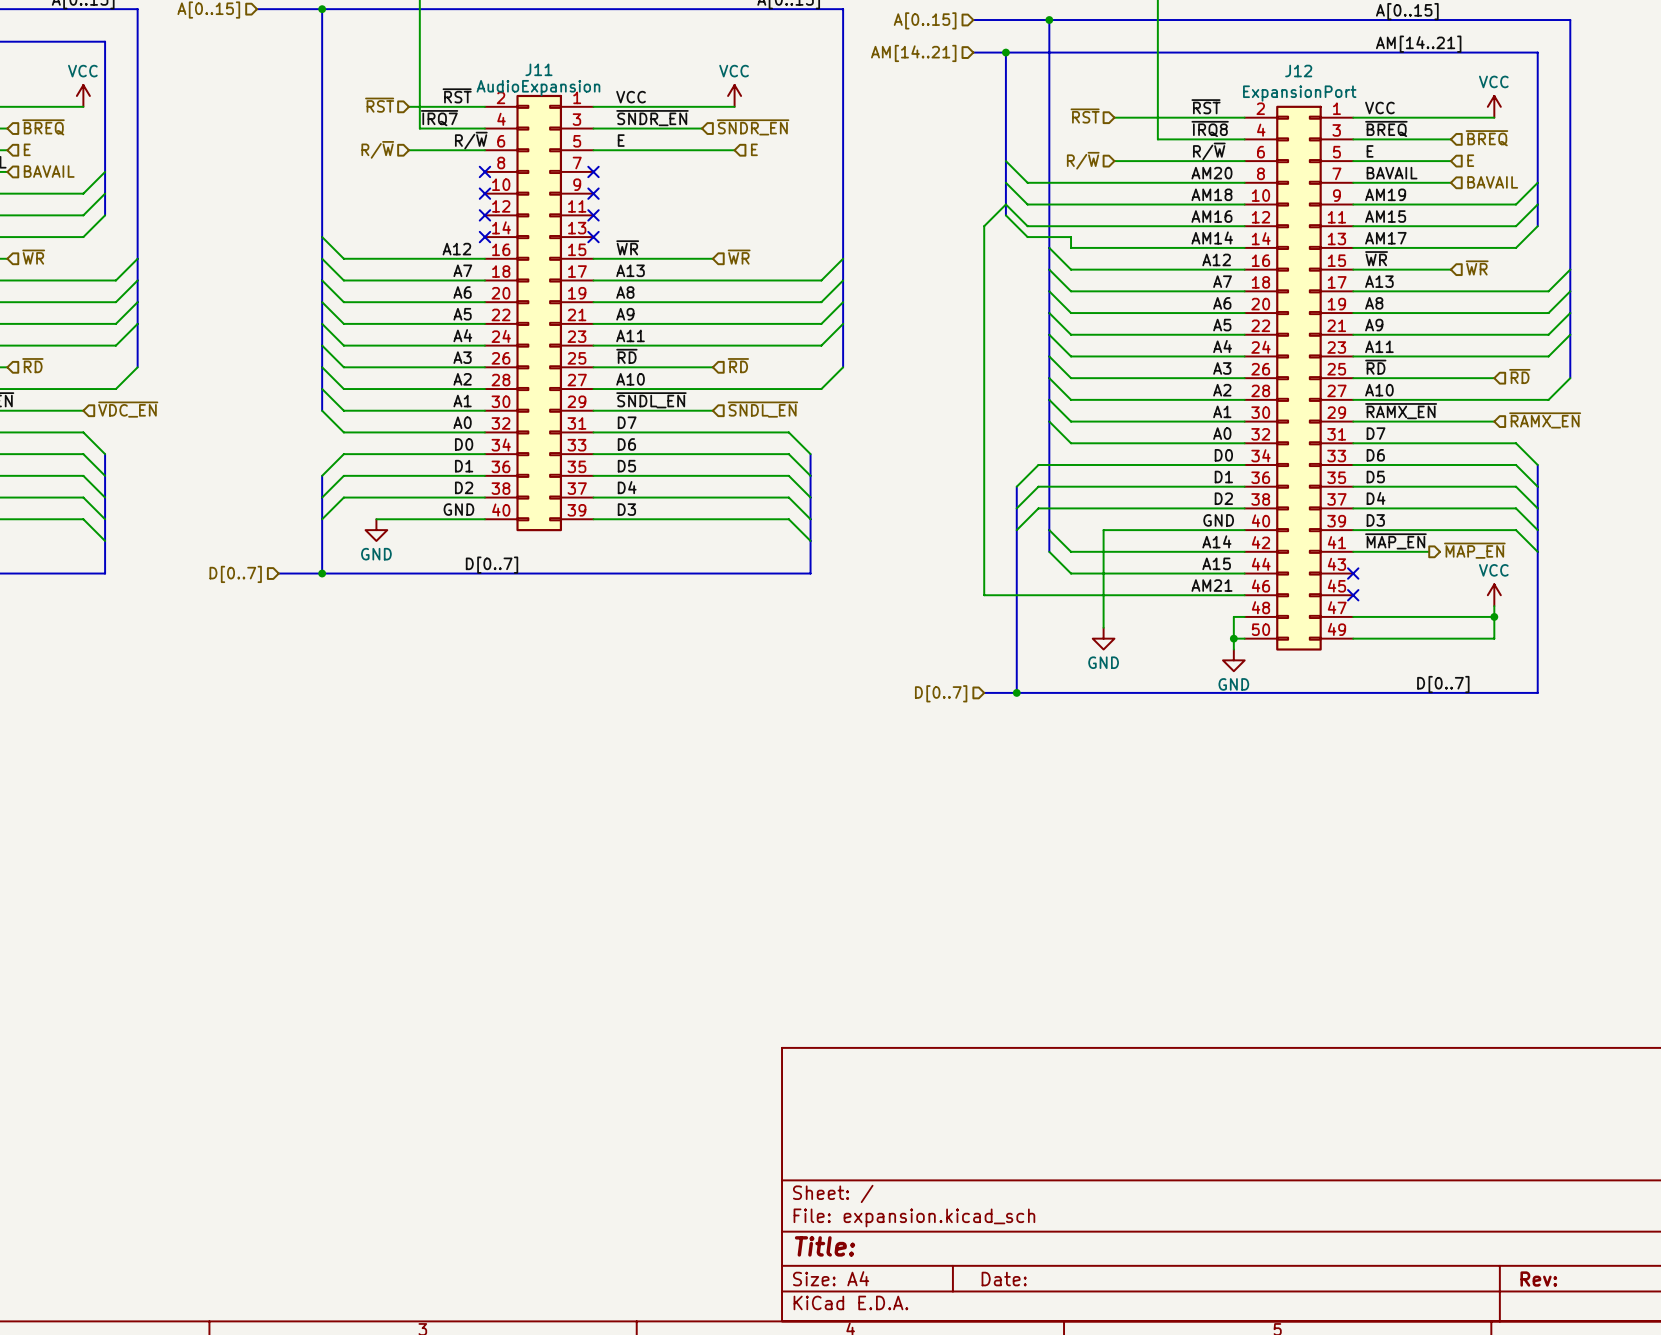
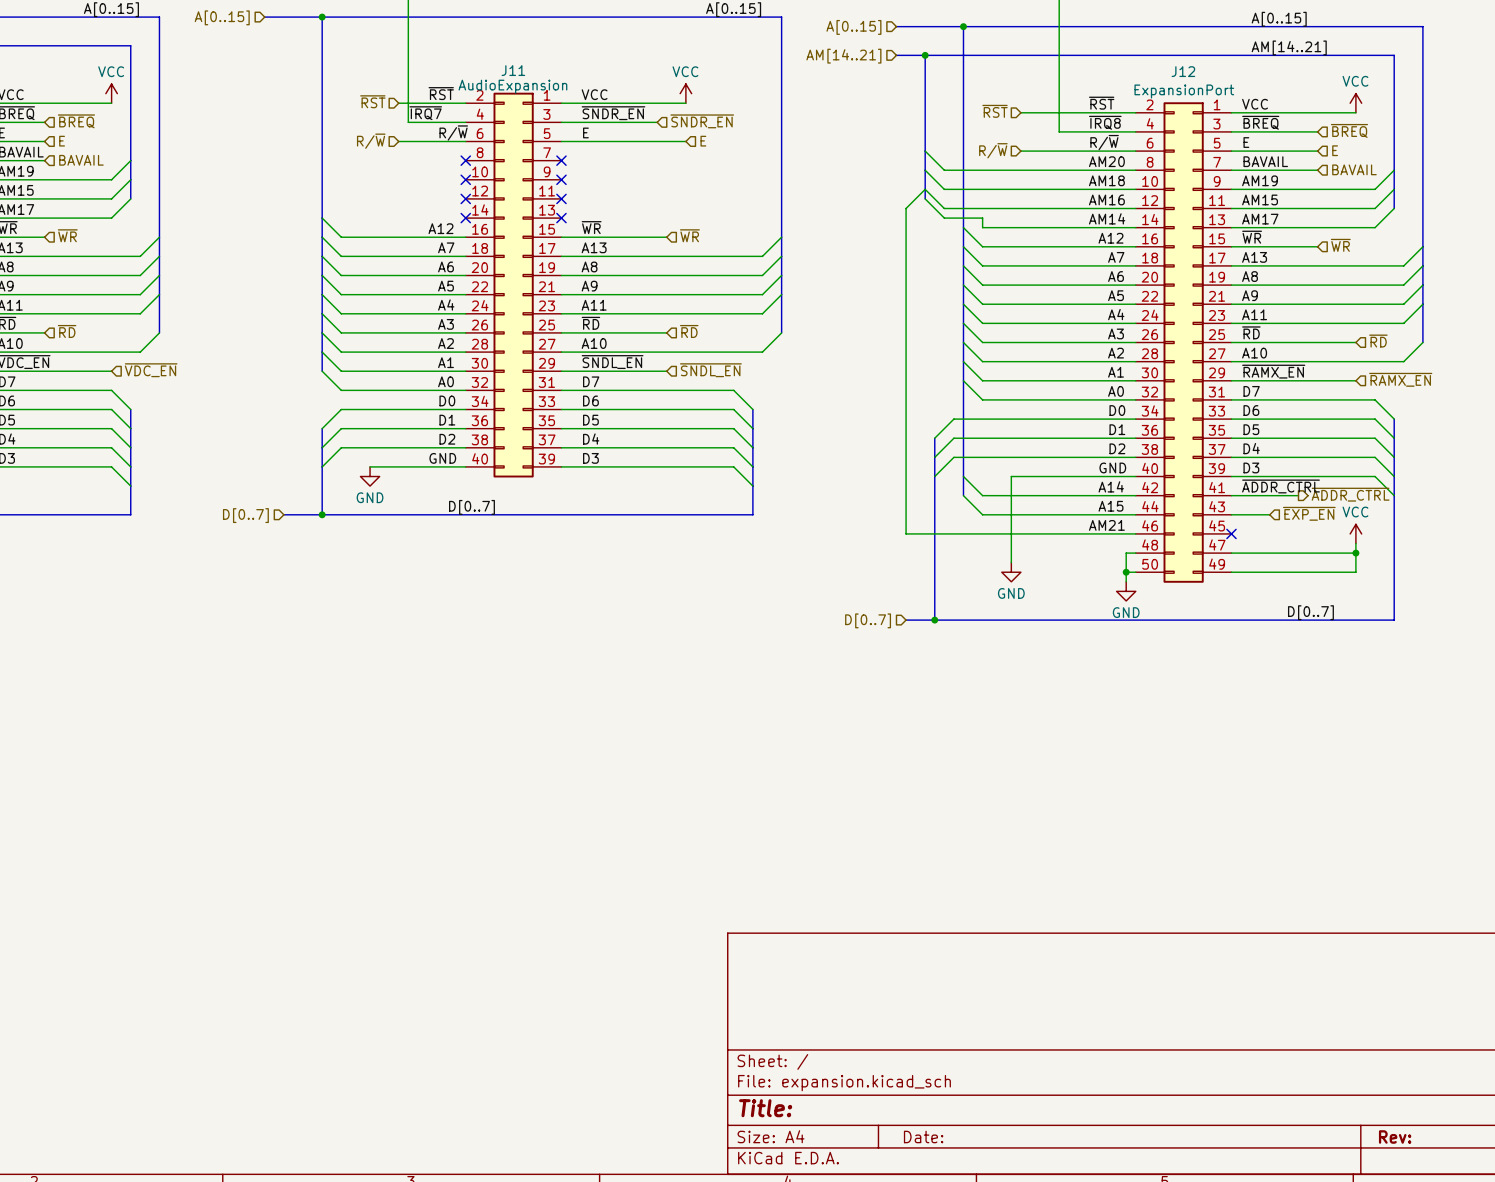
label: ~{MAP_EN} (1395, 541) -> ~{ADDR_CTRL} (1281, 486)
hierarchical label: ~{MAP_EN} (1474, 550) -> ~{ADDR_CTRL} (1350, 494)
hierarchical label: none -> ~{EXP_EN} (1309, 513)
wire: none -> (1231, 514) (1269, 514)
no-connect mark: (1353, 573) -> none

